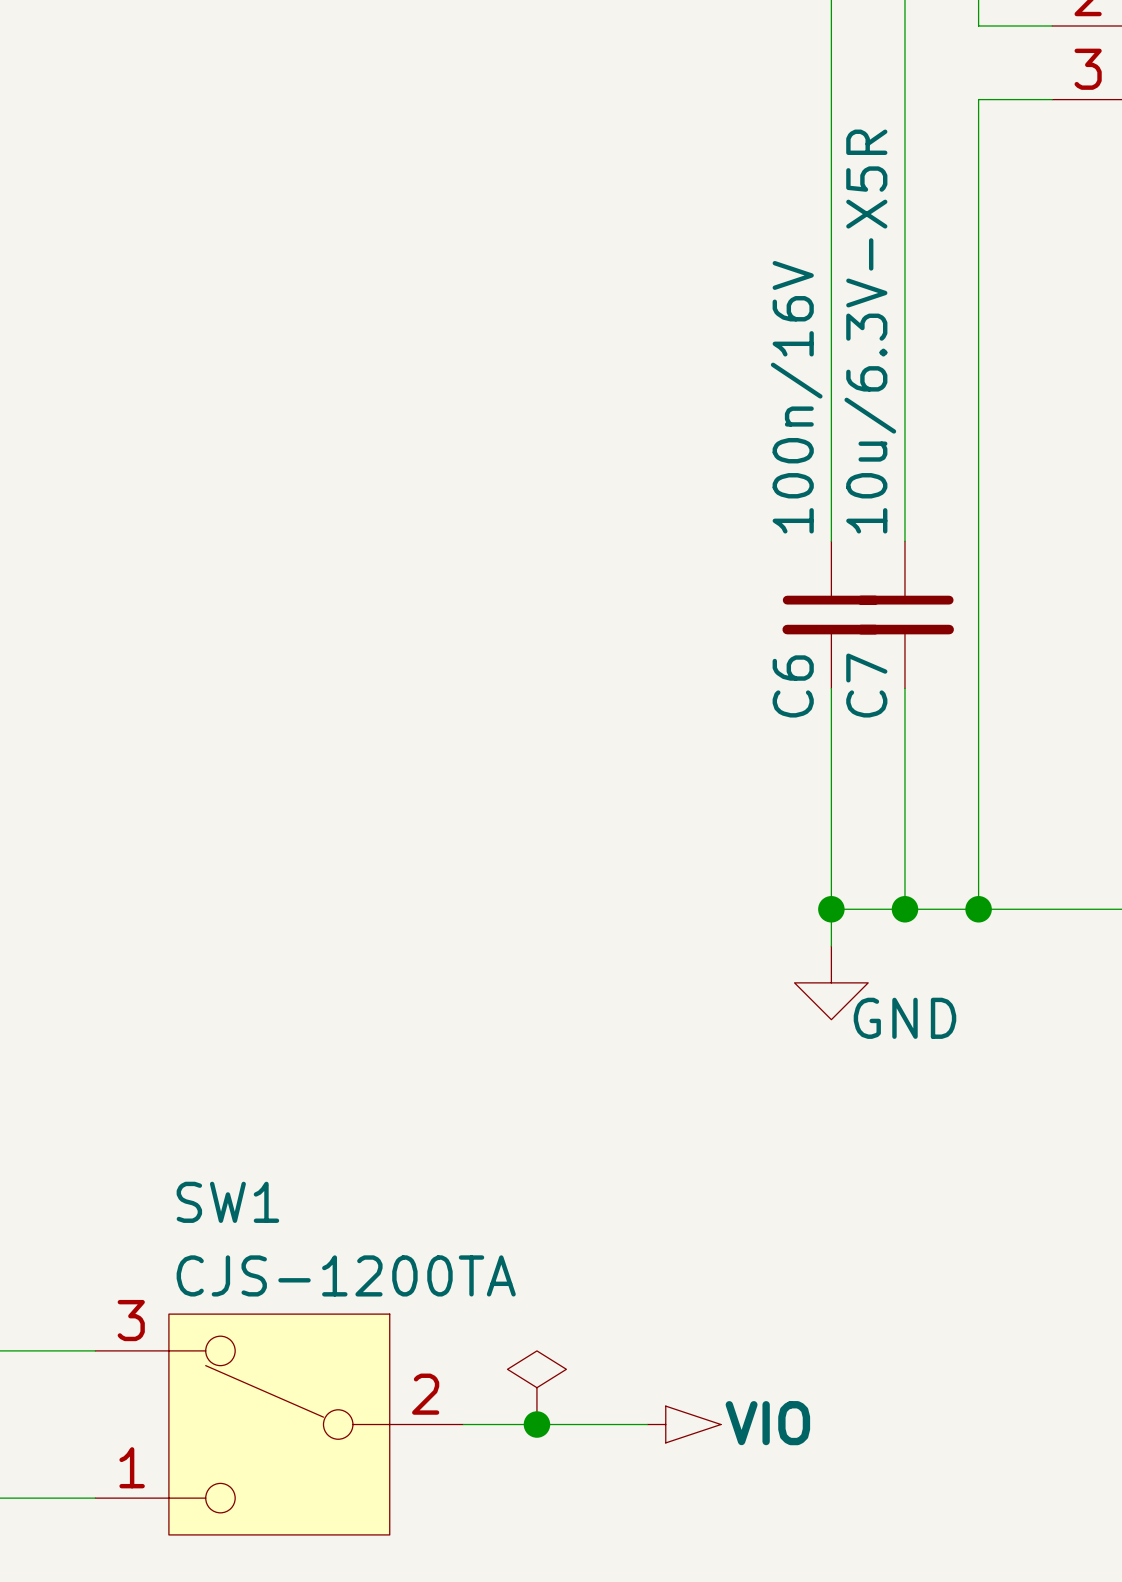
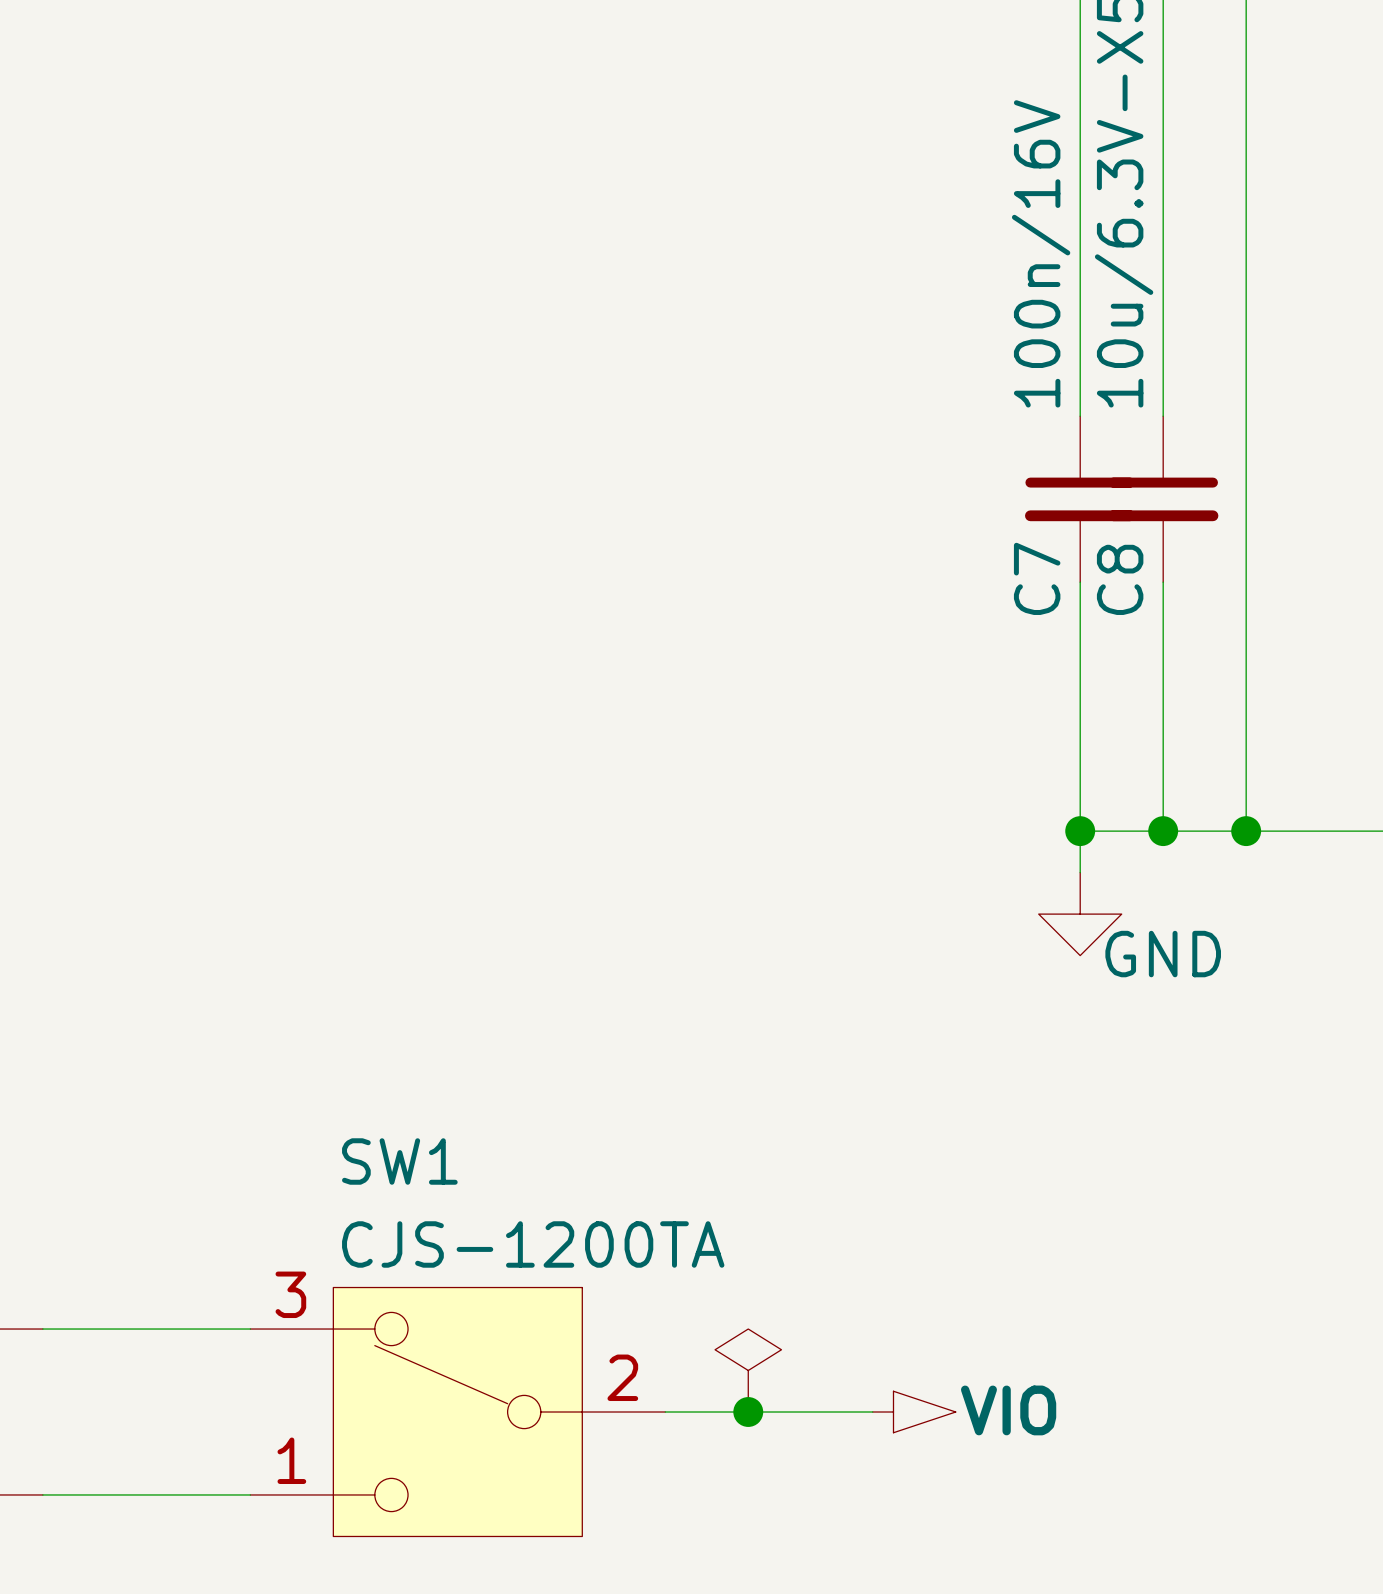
C7 name: C7 (866, 685) -> C8 (1120, 579)
C6 name: C6 (793, 686) -> C7 (1037, 578)

